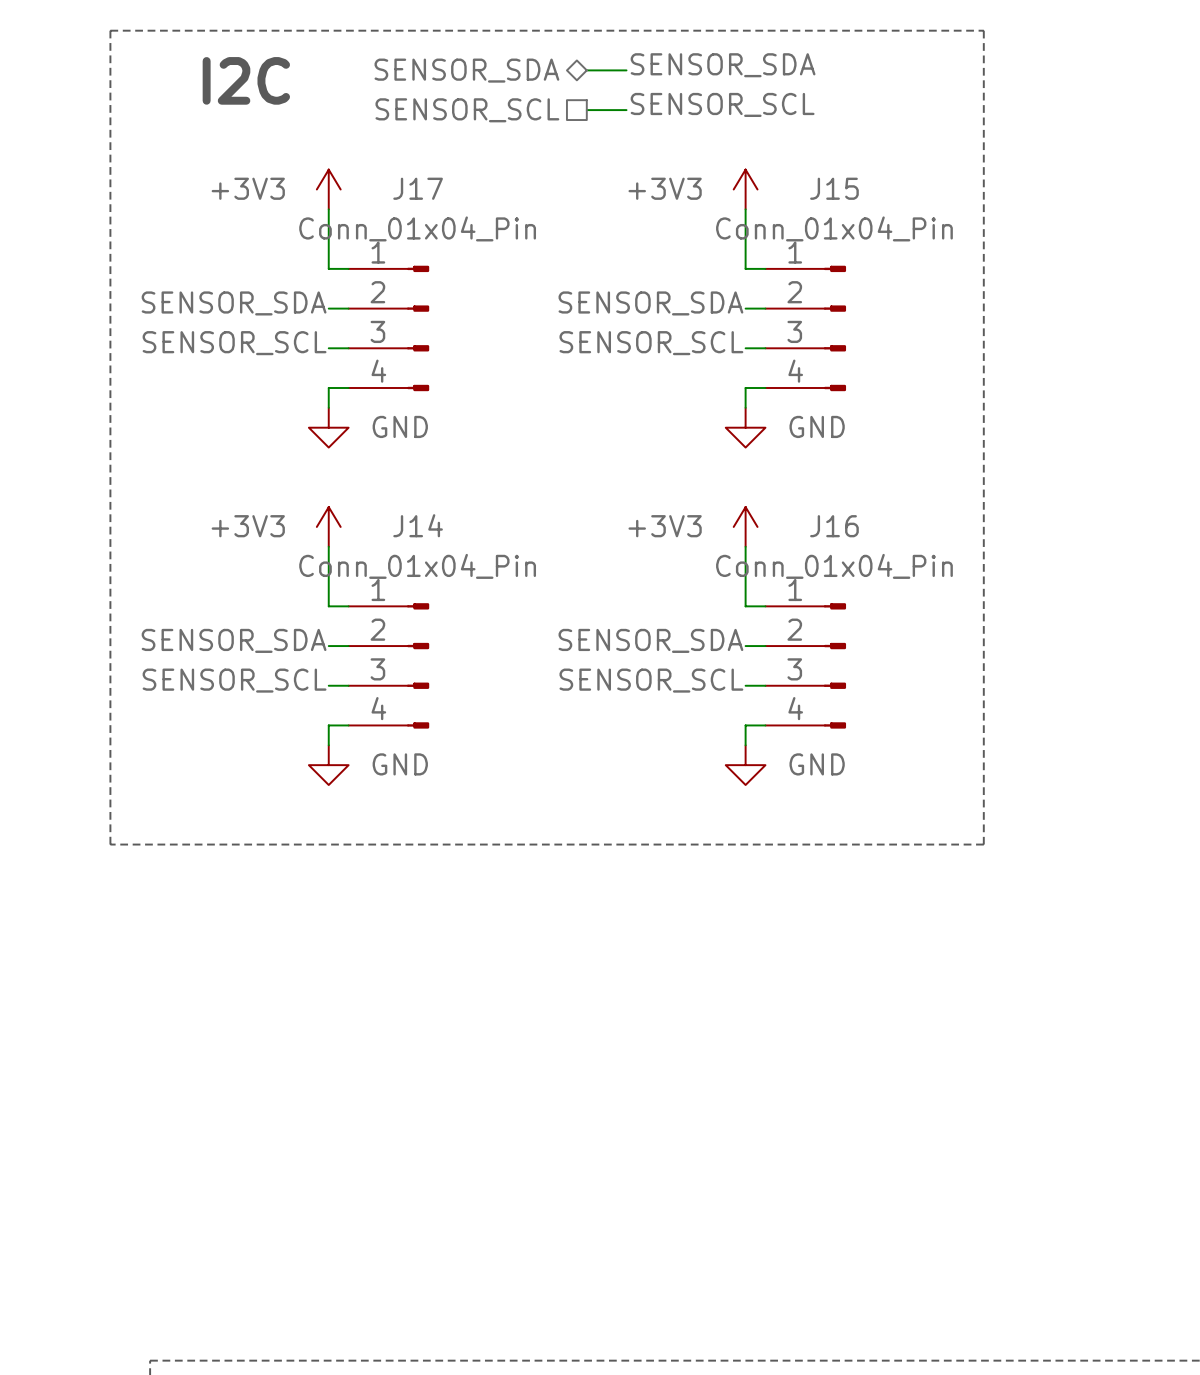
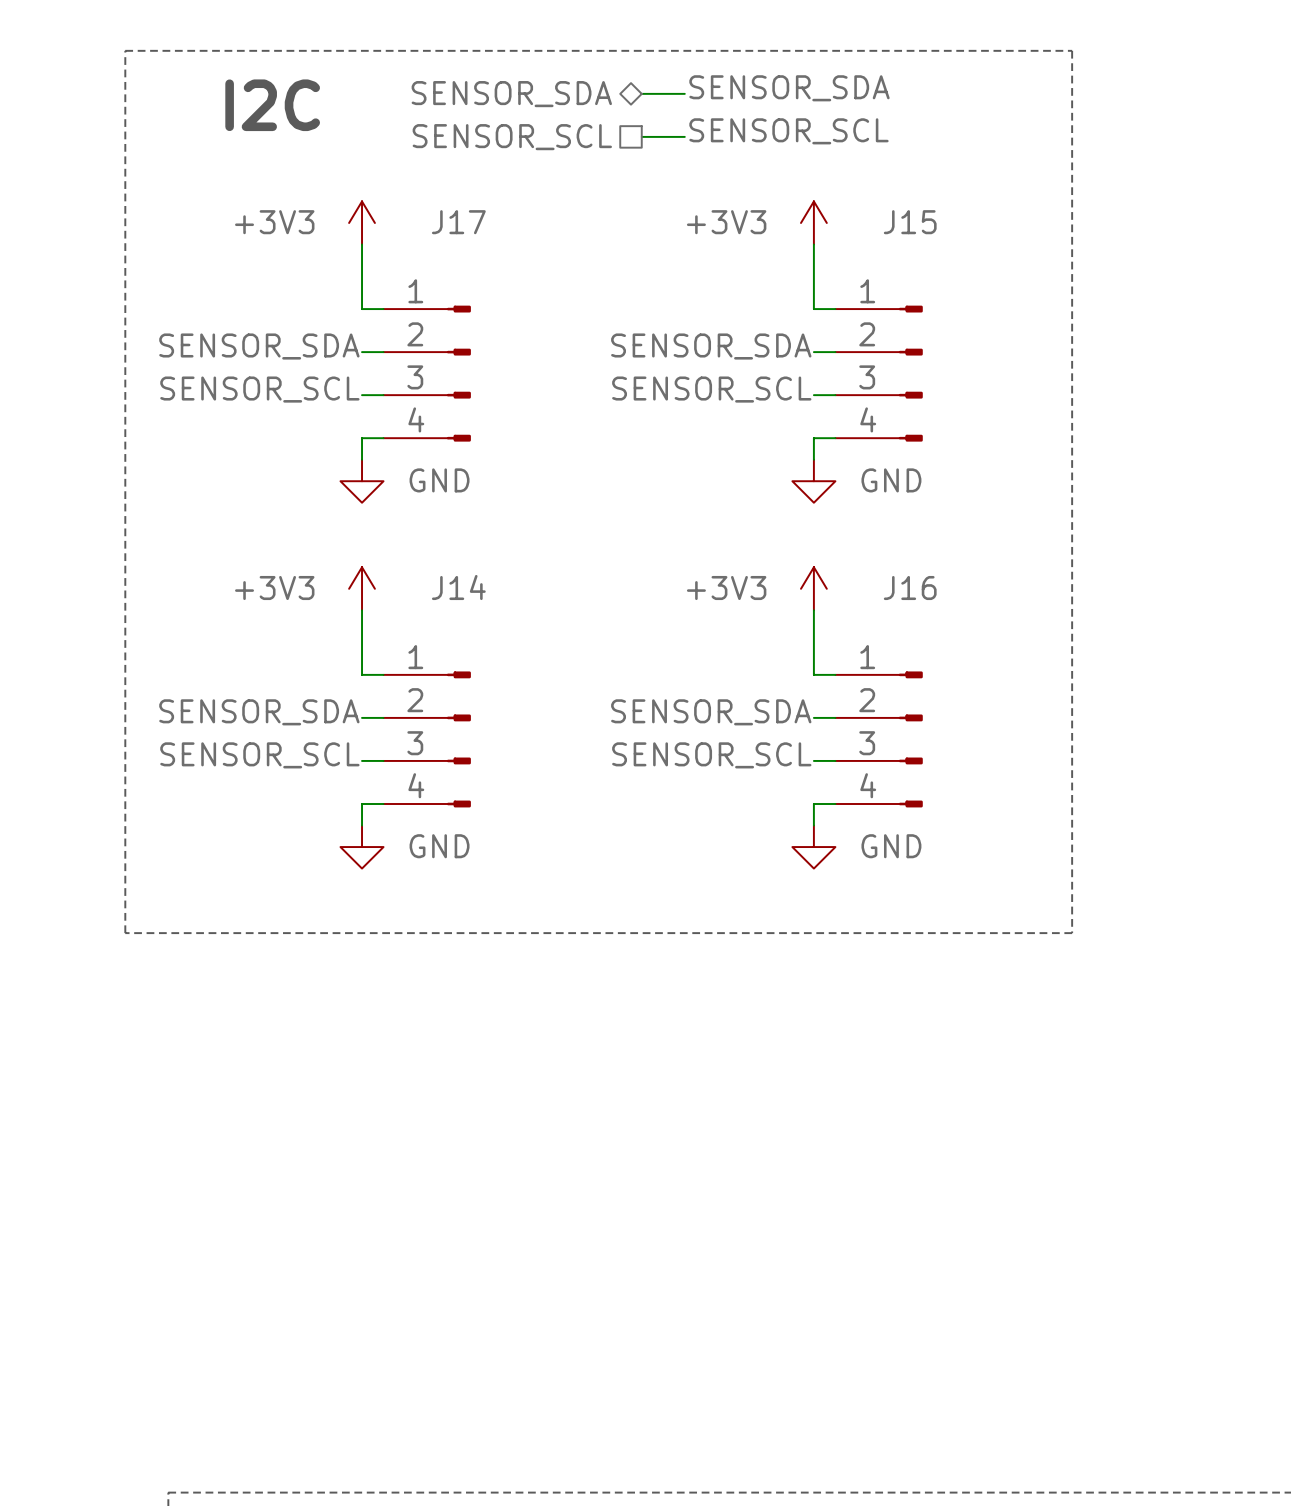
J17 value: Conn_01x04_Pin (417, 228) -> none
J15 value: Conn_01x04_Pin (834, 228) -> none
J14 value: Conn_01x04_Pin (417, 566) -> none
J16 value: Conn_01x04_Pin (834, 566) -> none

